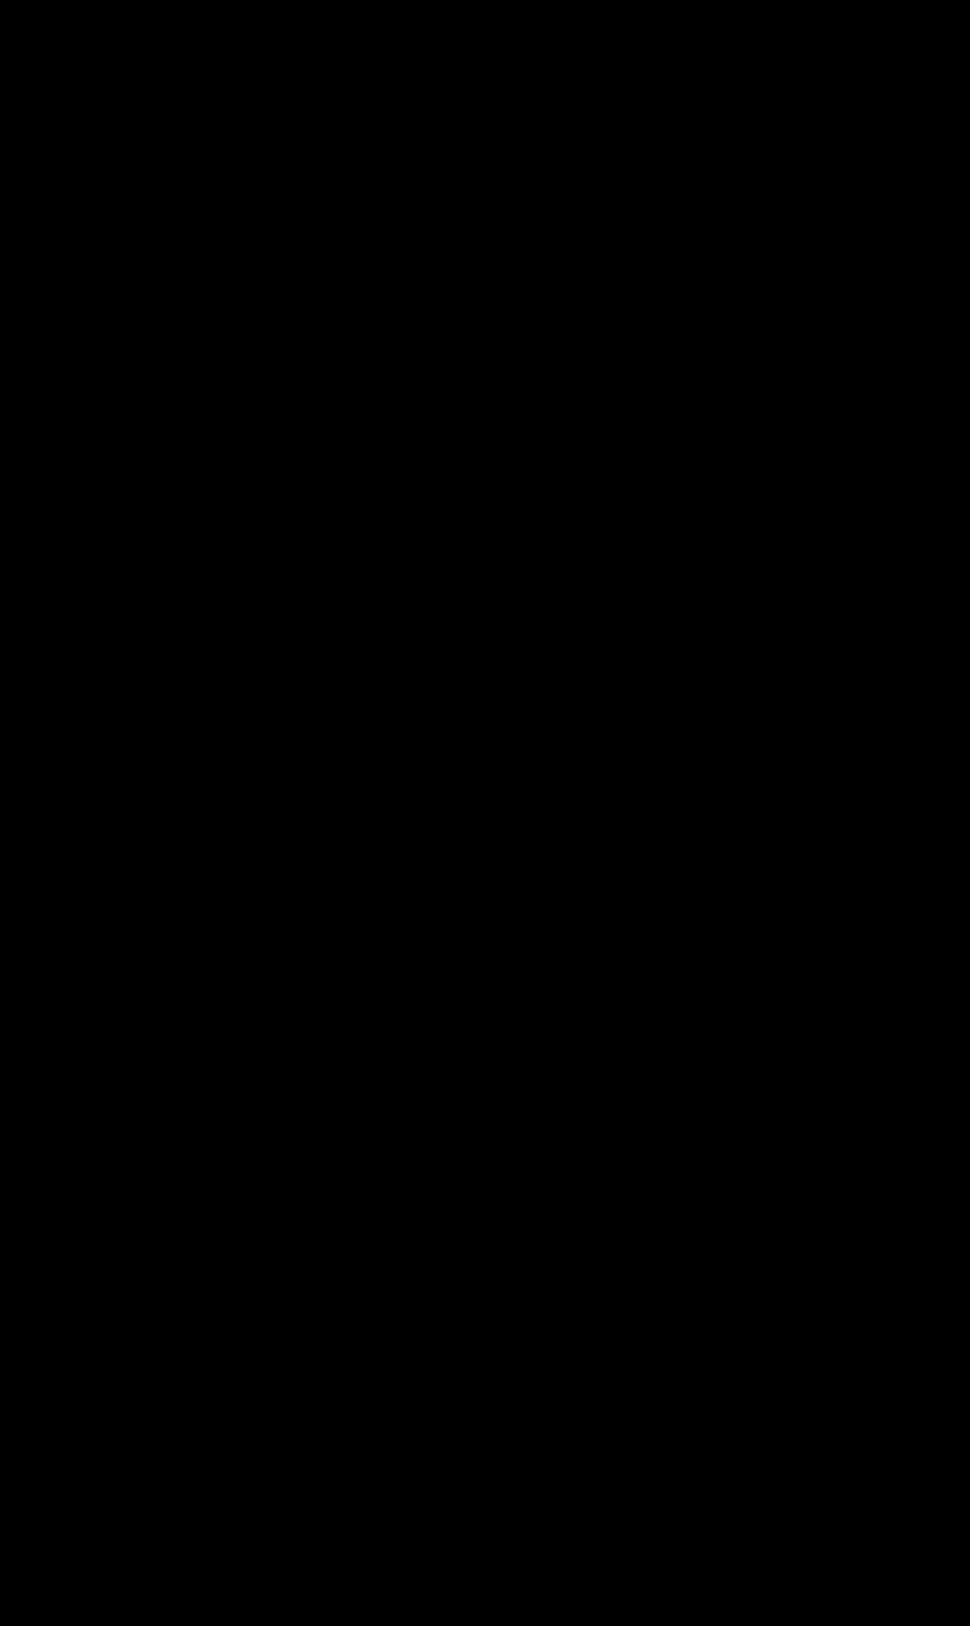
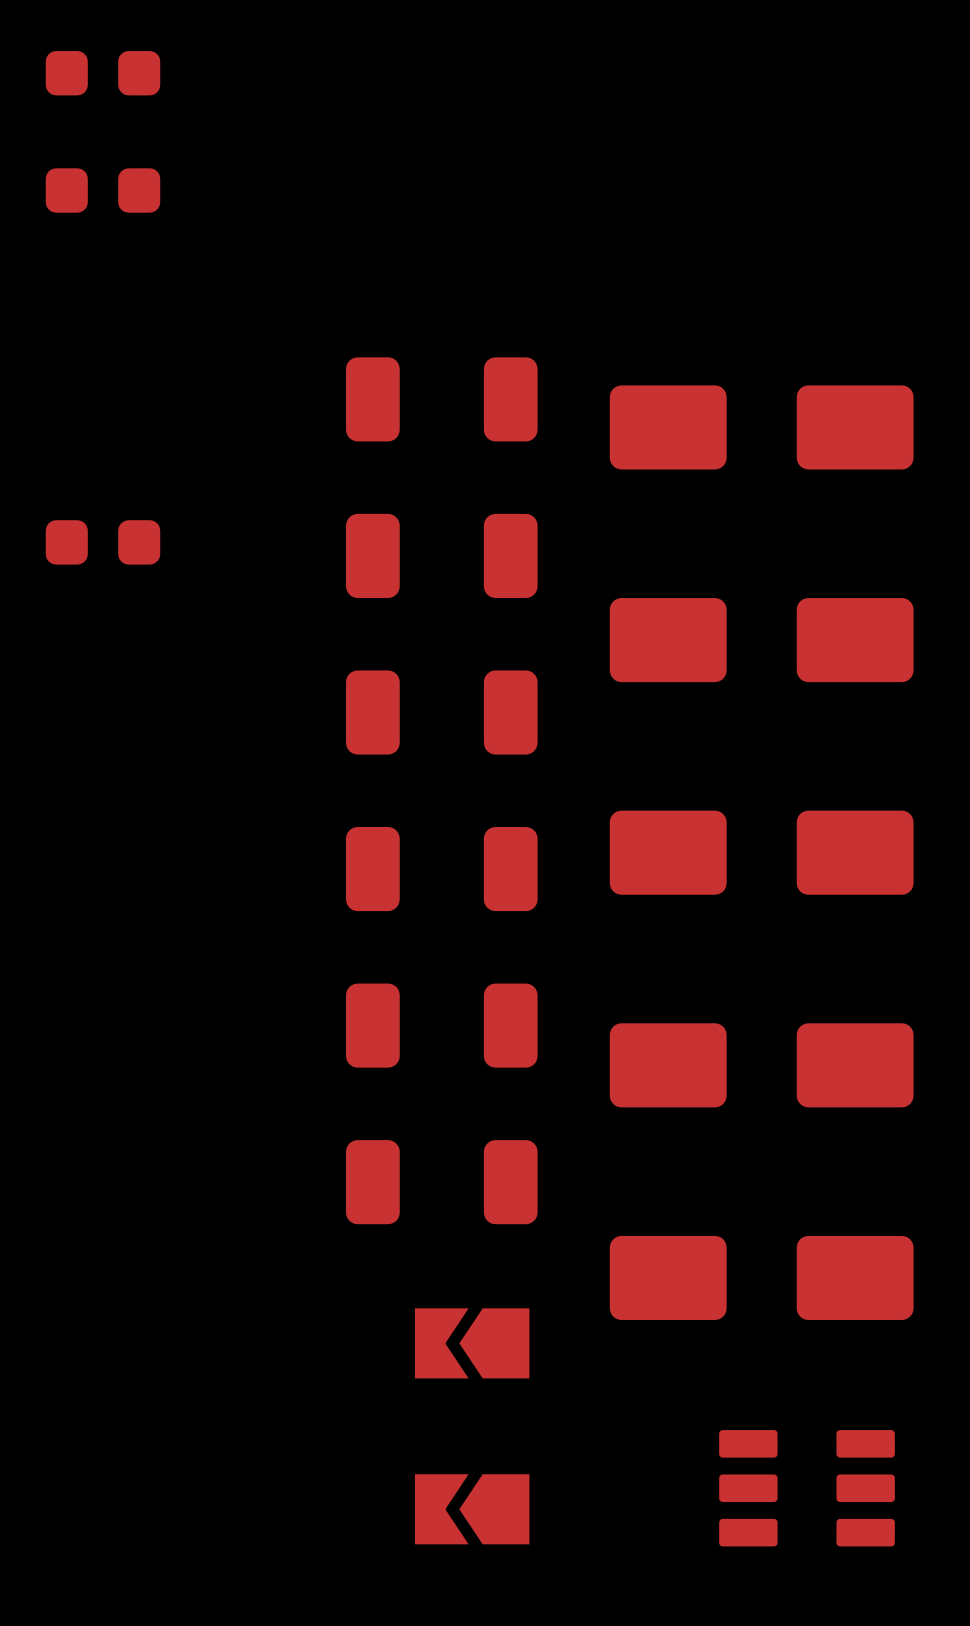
part: none -> (103, 73)
part: none -> (103, 190)
part: none -> (441, 399)
part: none -> (761, 427)
part: none -> (103, 542)
part: none -> (441, 555)
part: none -> (761, 640)
part: none -> (441, 712)
part: none -> (761, 852)
part: none -> (441, 869)
part: none -> (441, 1025)
part: none -> (761, 1065)
part: none -> (441, 1182)
part: none -> (761, 1277)
part: none -> (472, 1343)
part: none -> (807, 1488)
part: none -> (472, 1509)

